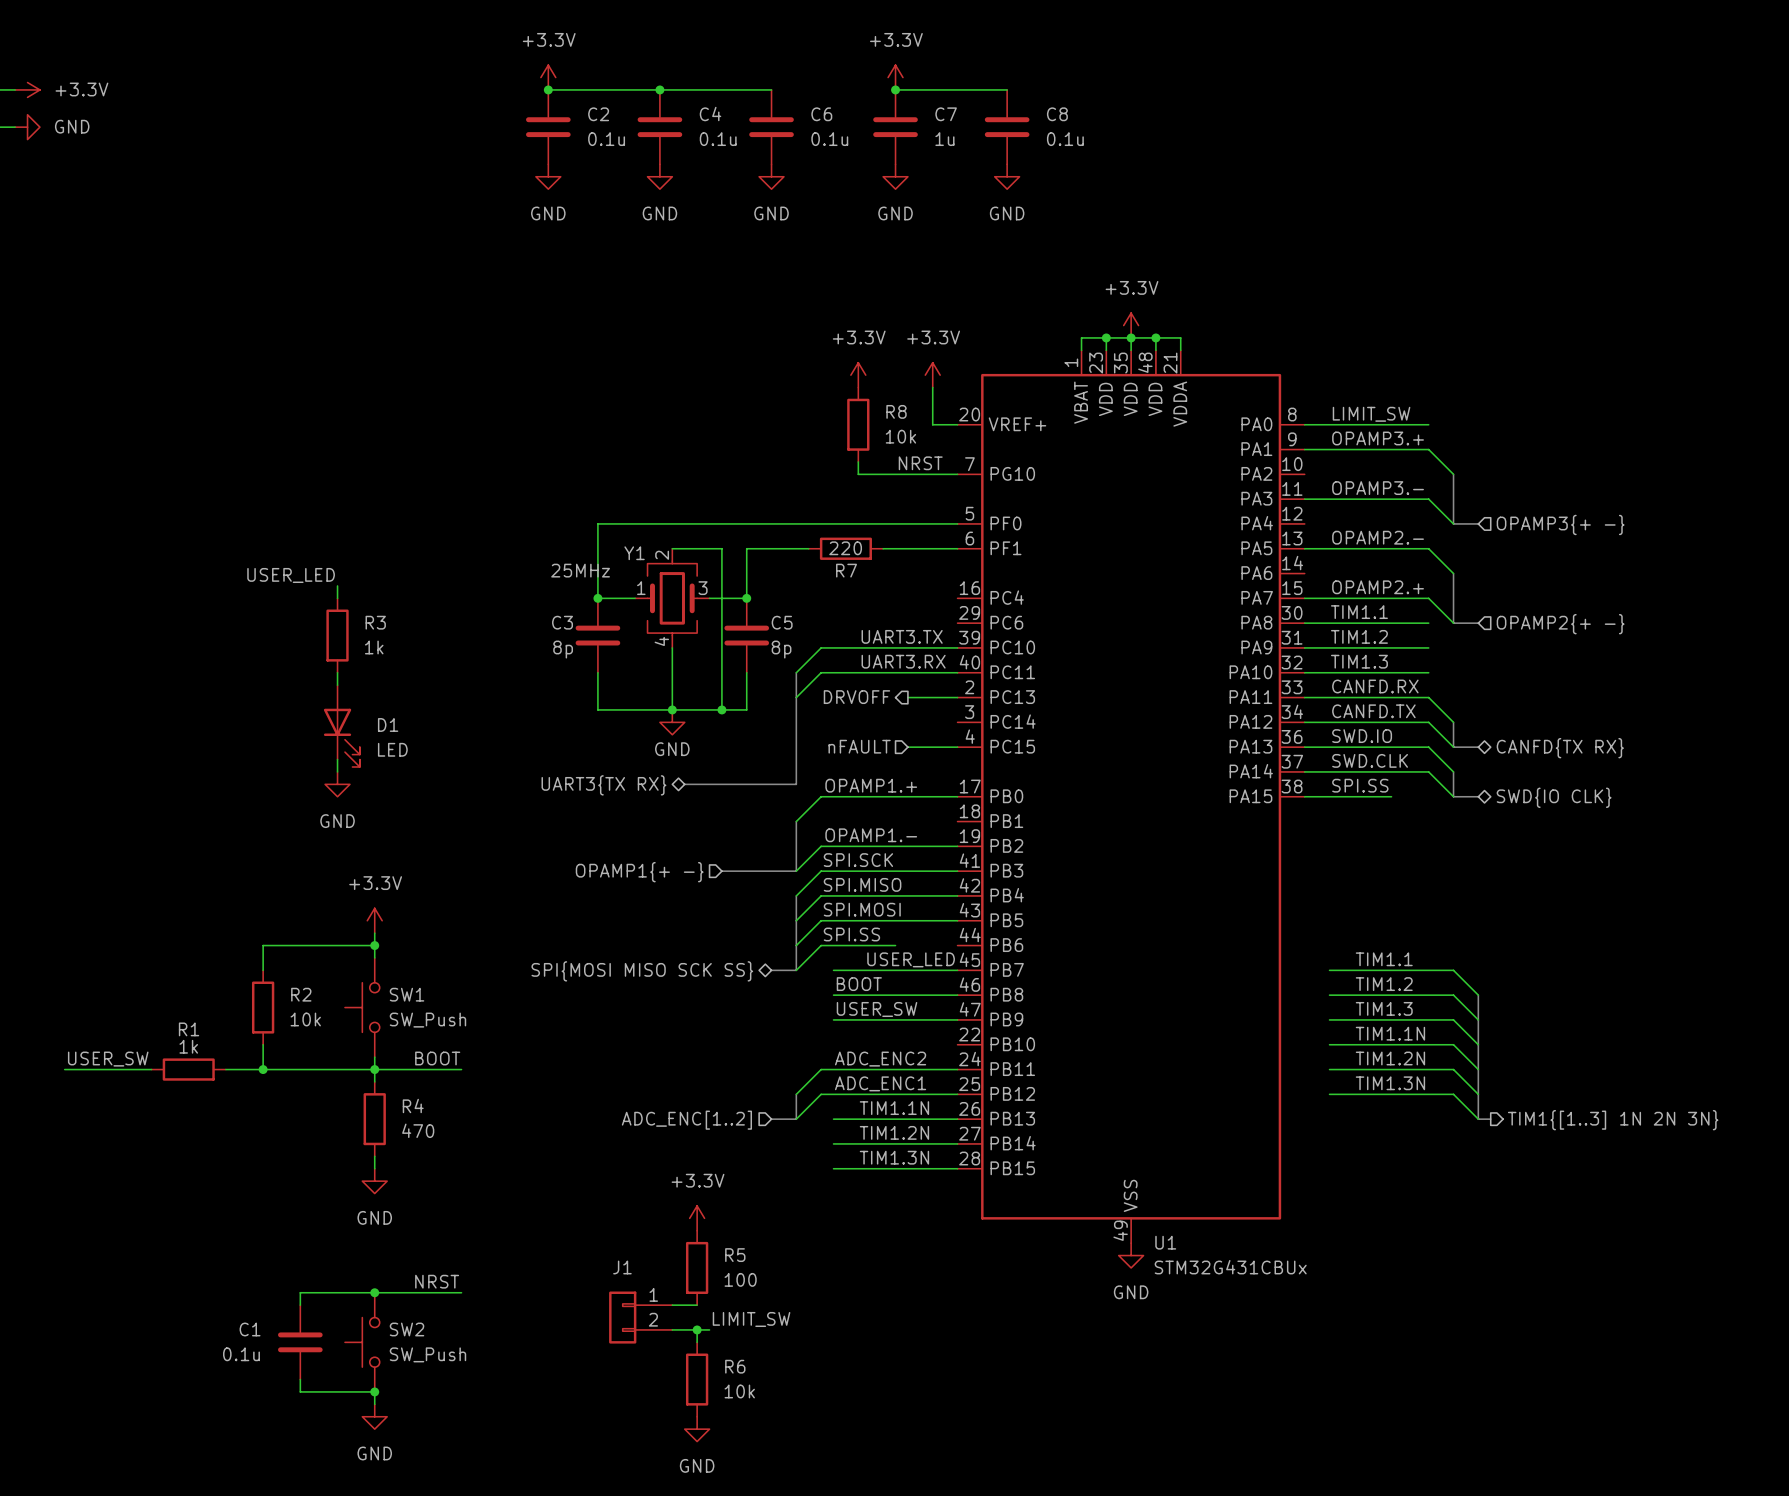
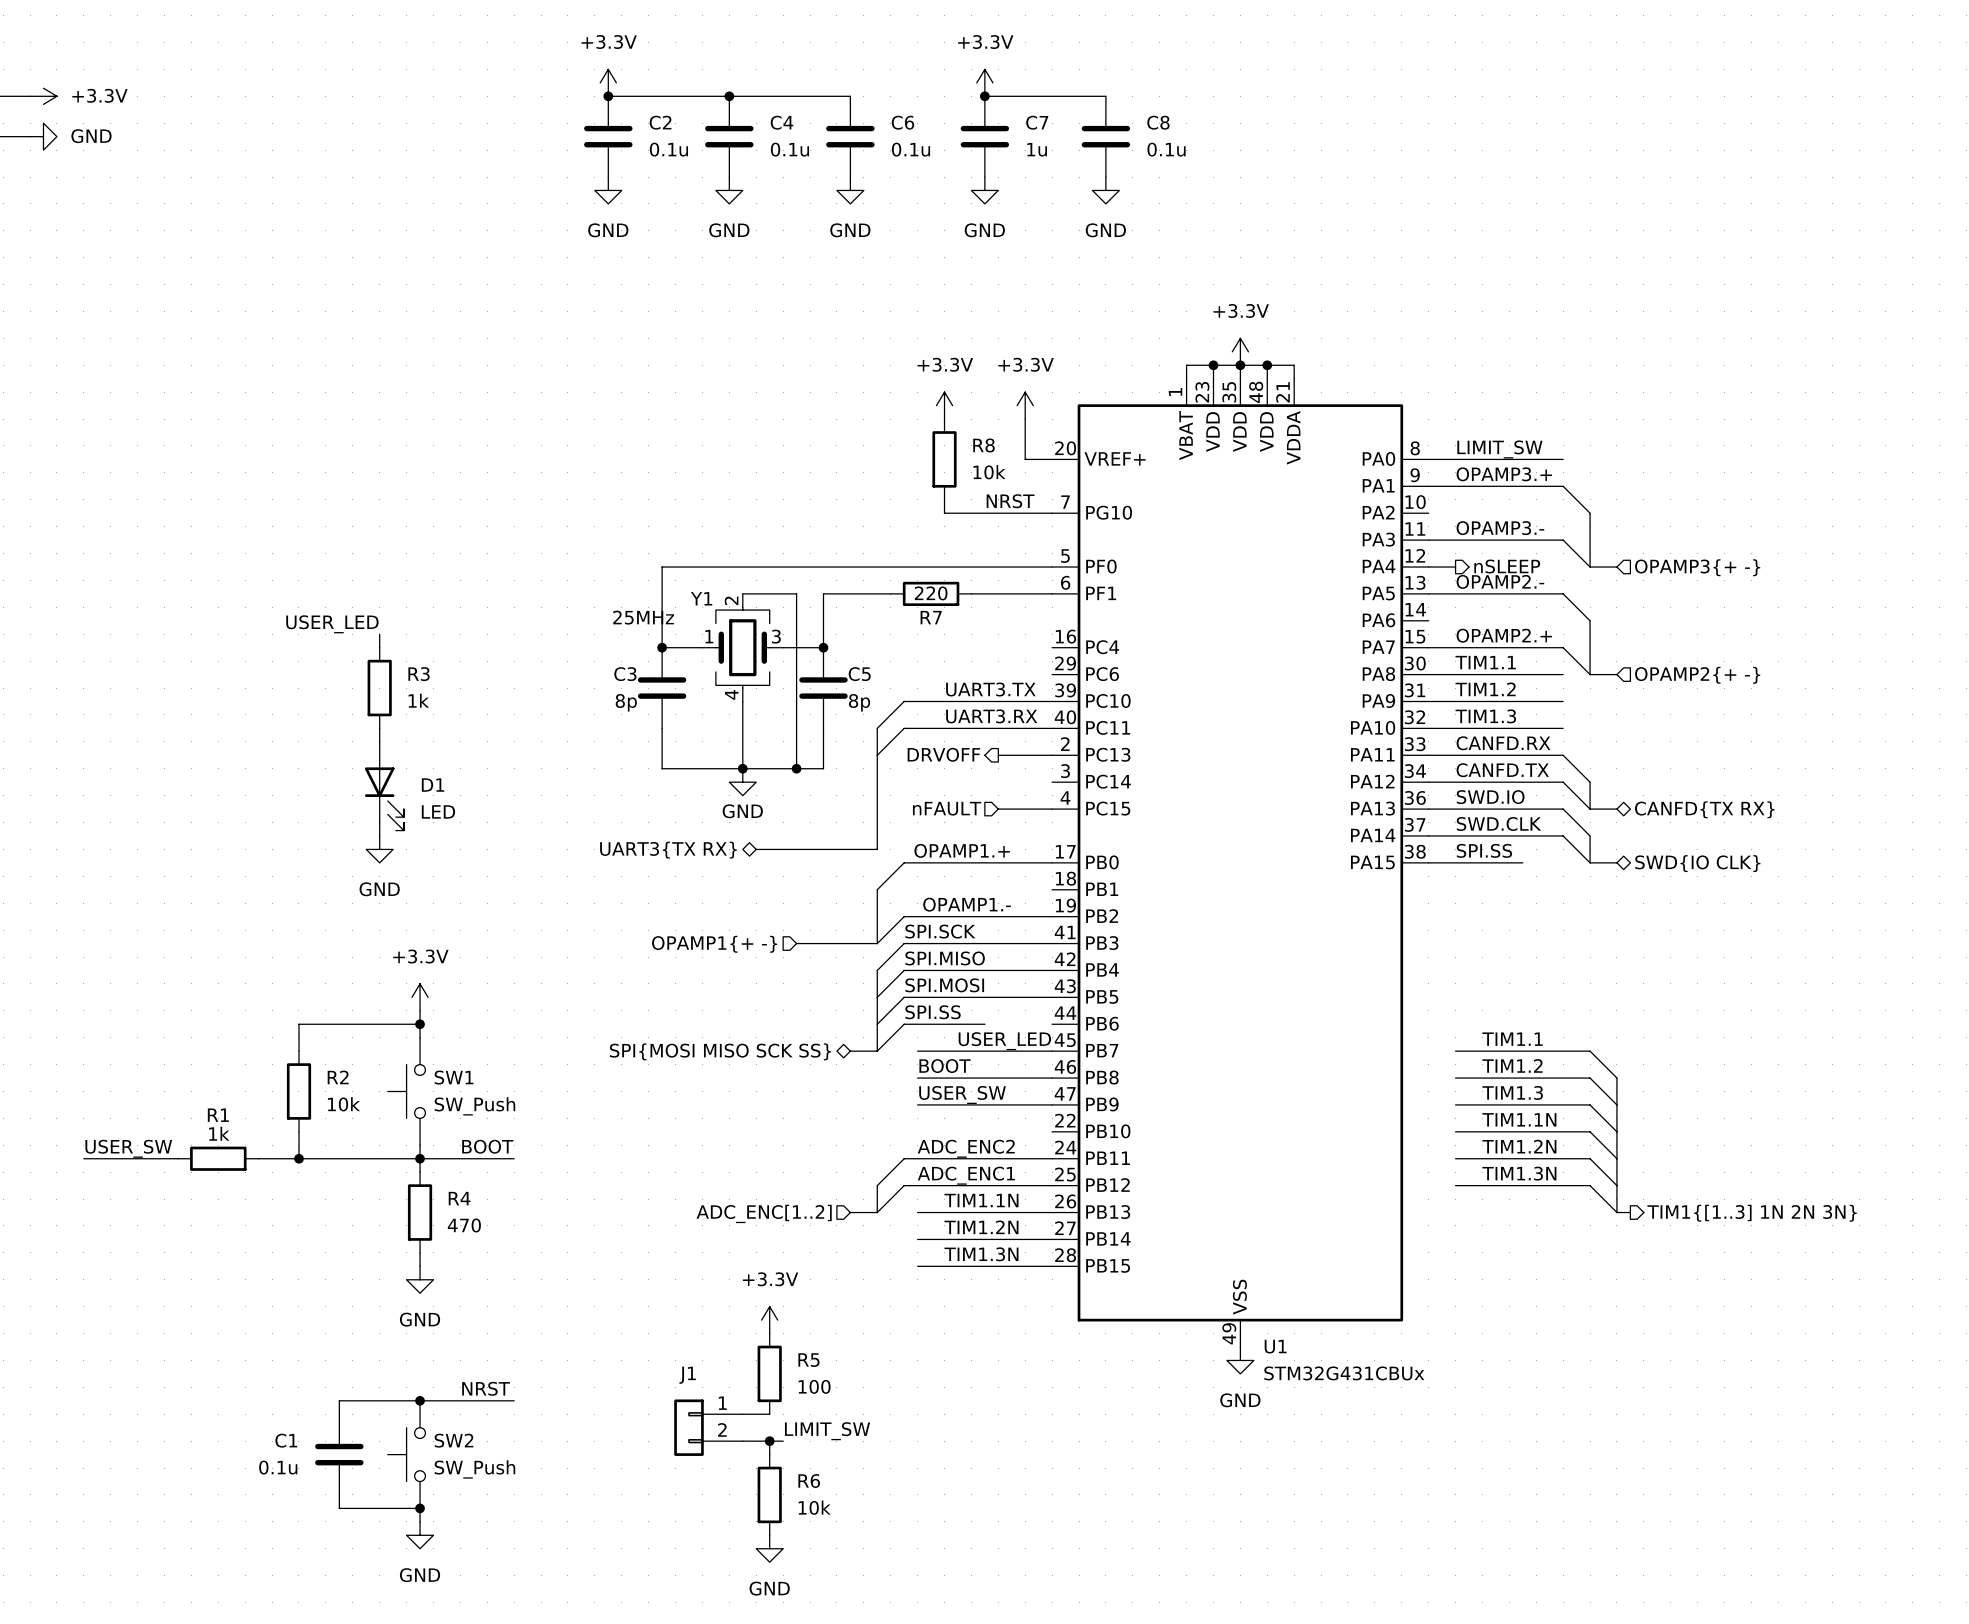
wire: none -> (1428, 567) (1455, 567)
hierarchical label: none -> nSLEEP (1507, 566)

